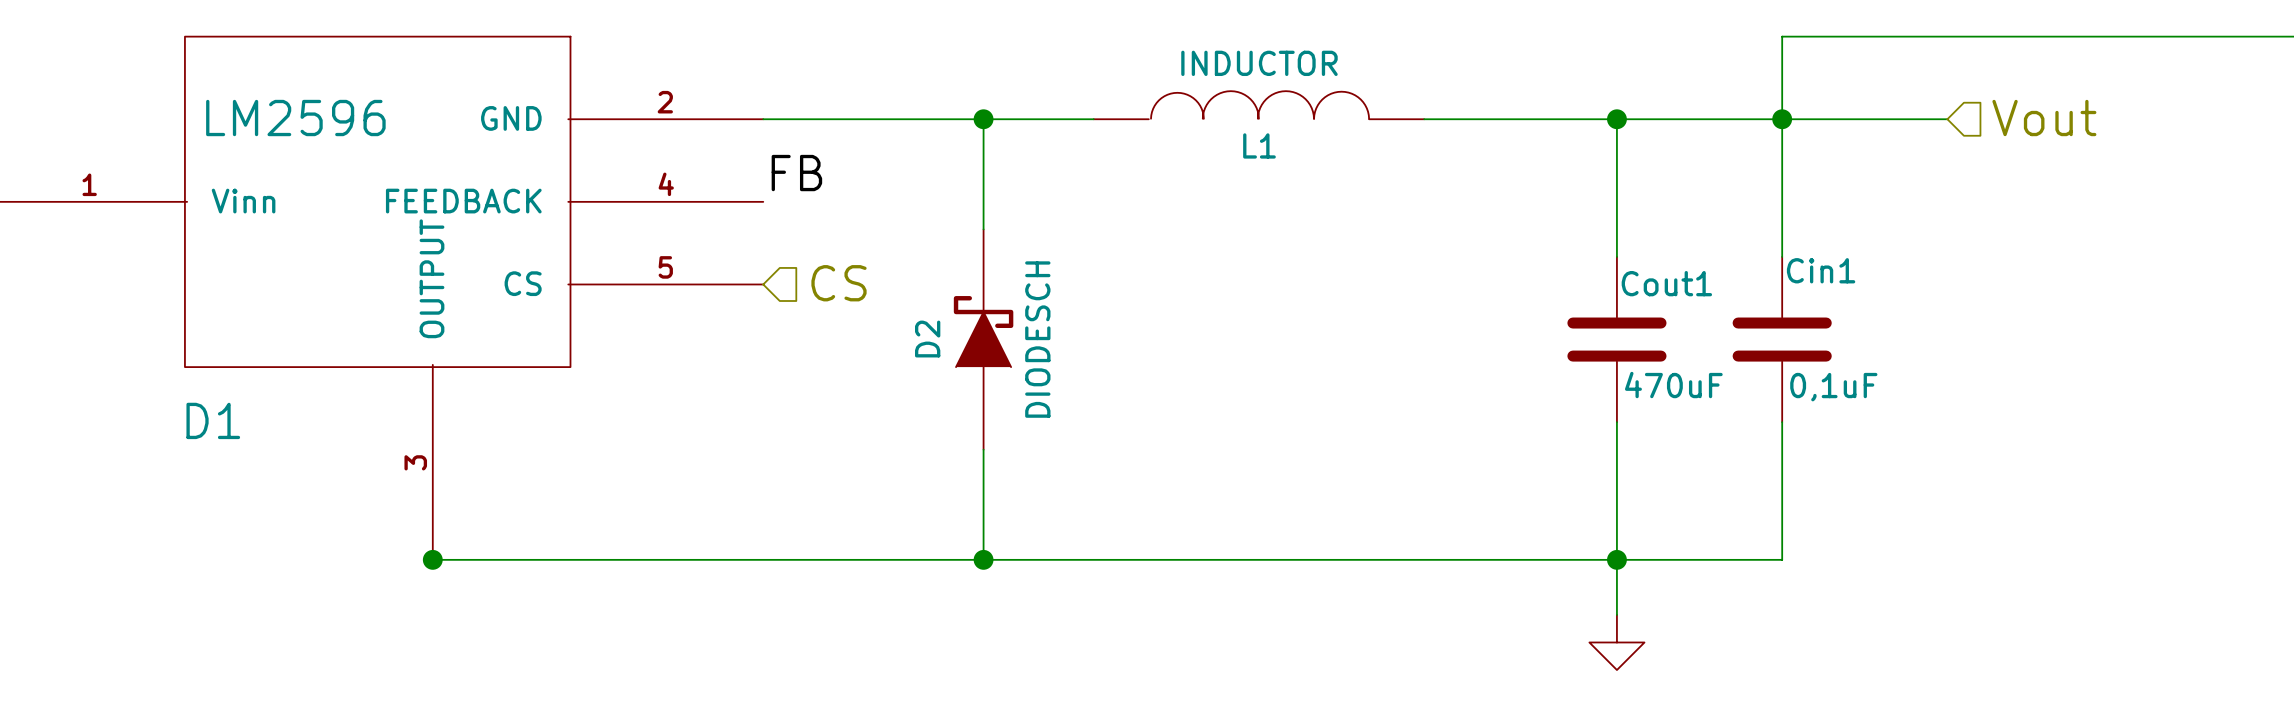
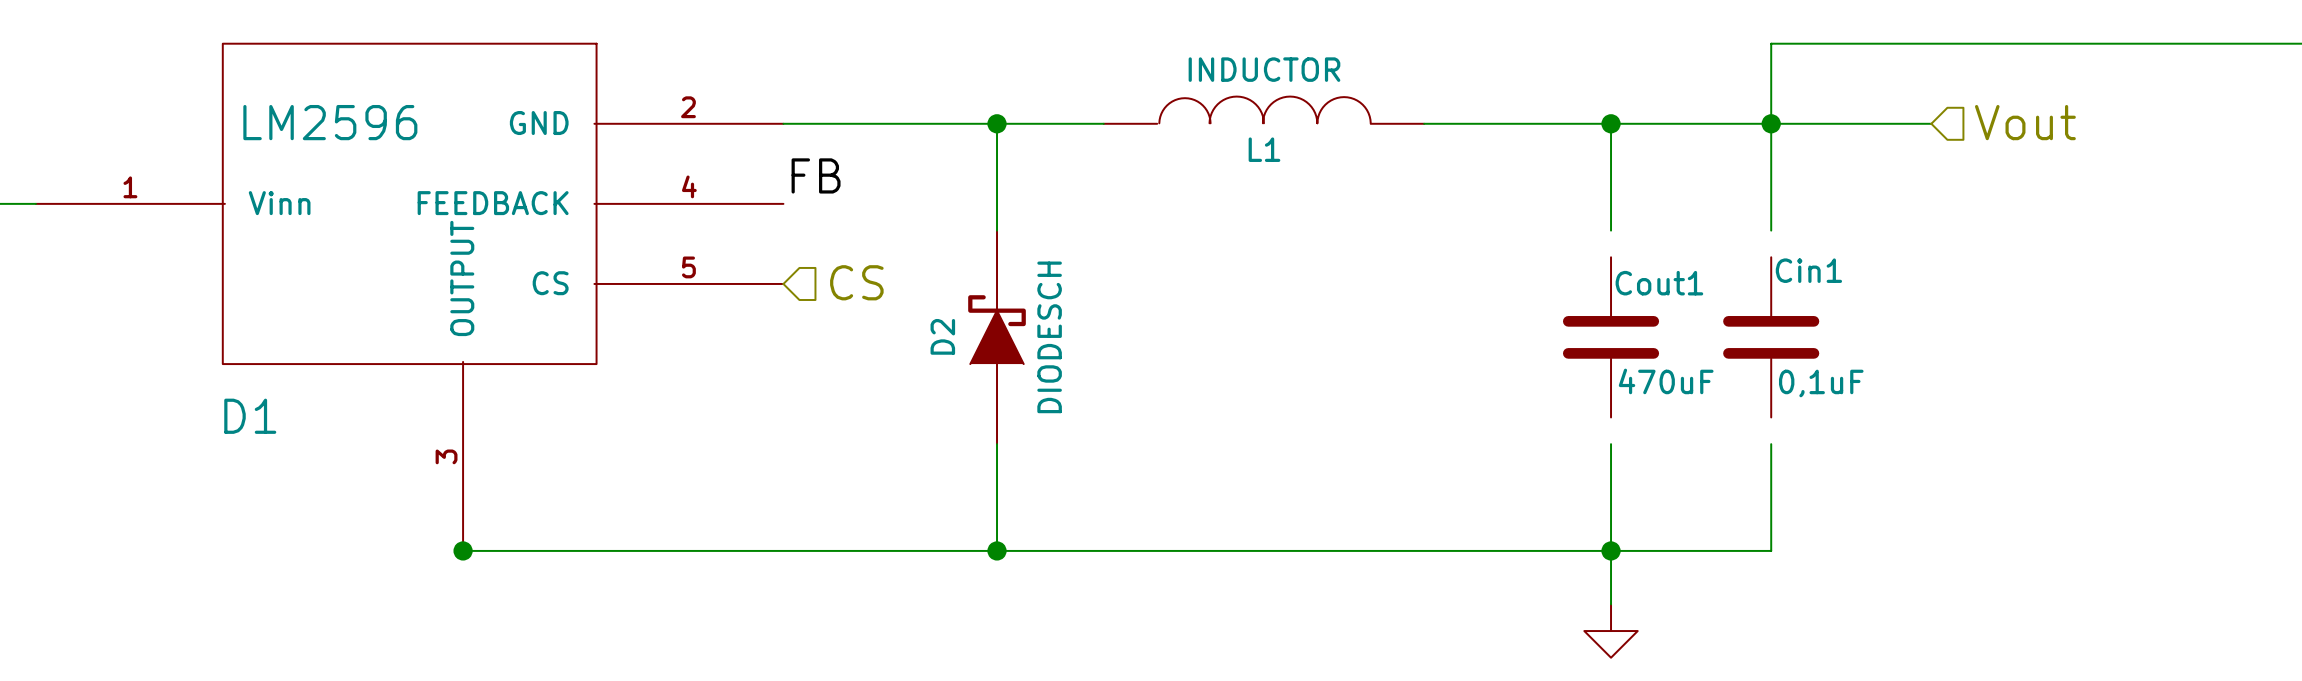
wire: (1616, 229) (1616, 256) -> none
wire: (1782, 229) (1782, 256) -> none
wire: (1616, 422) (1616, 449) -> none
wire: (1782, 422) (1782, 449) -> none

